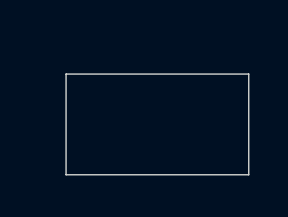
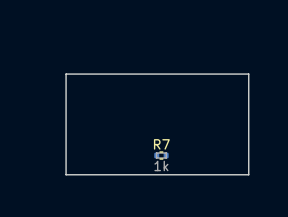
R7: none -> 1k (161, 155)

